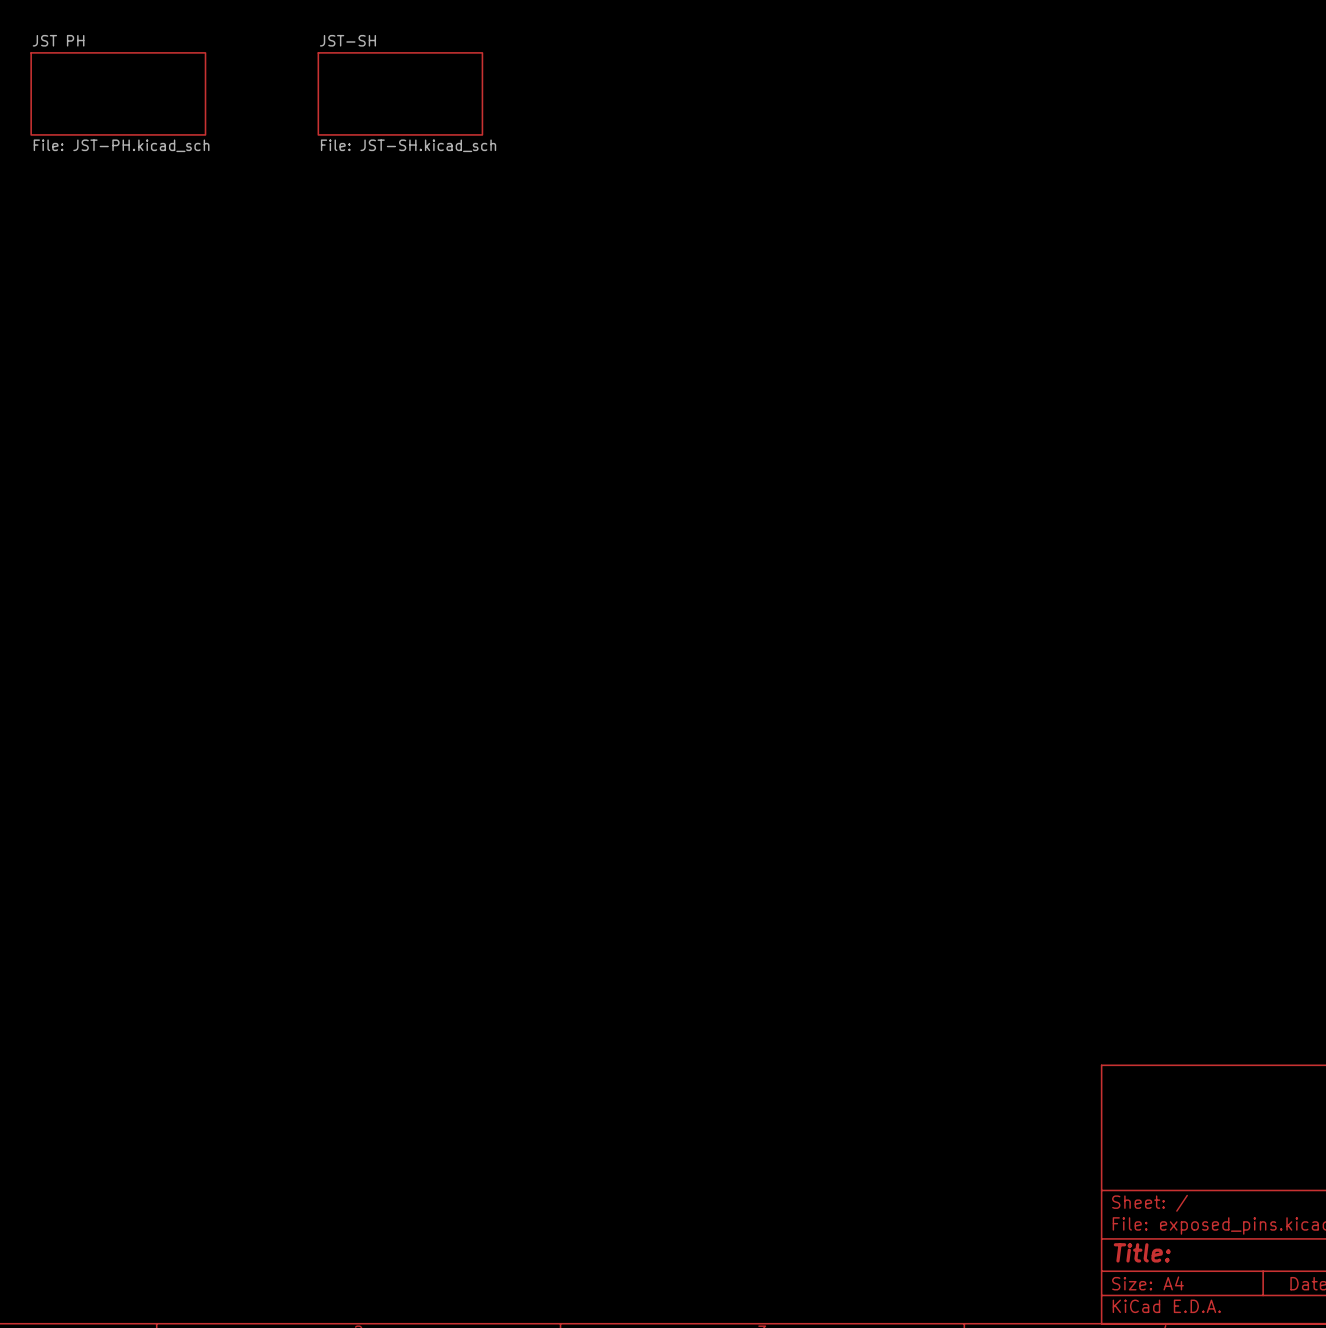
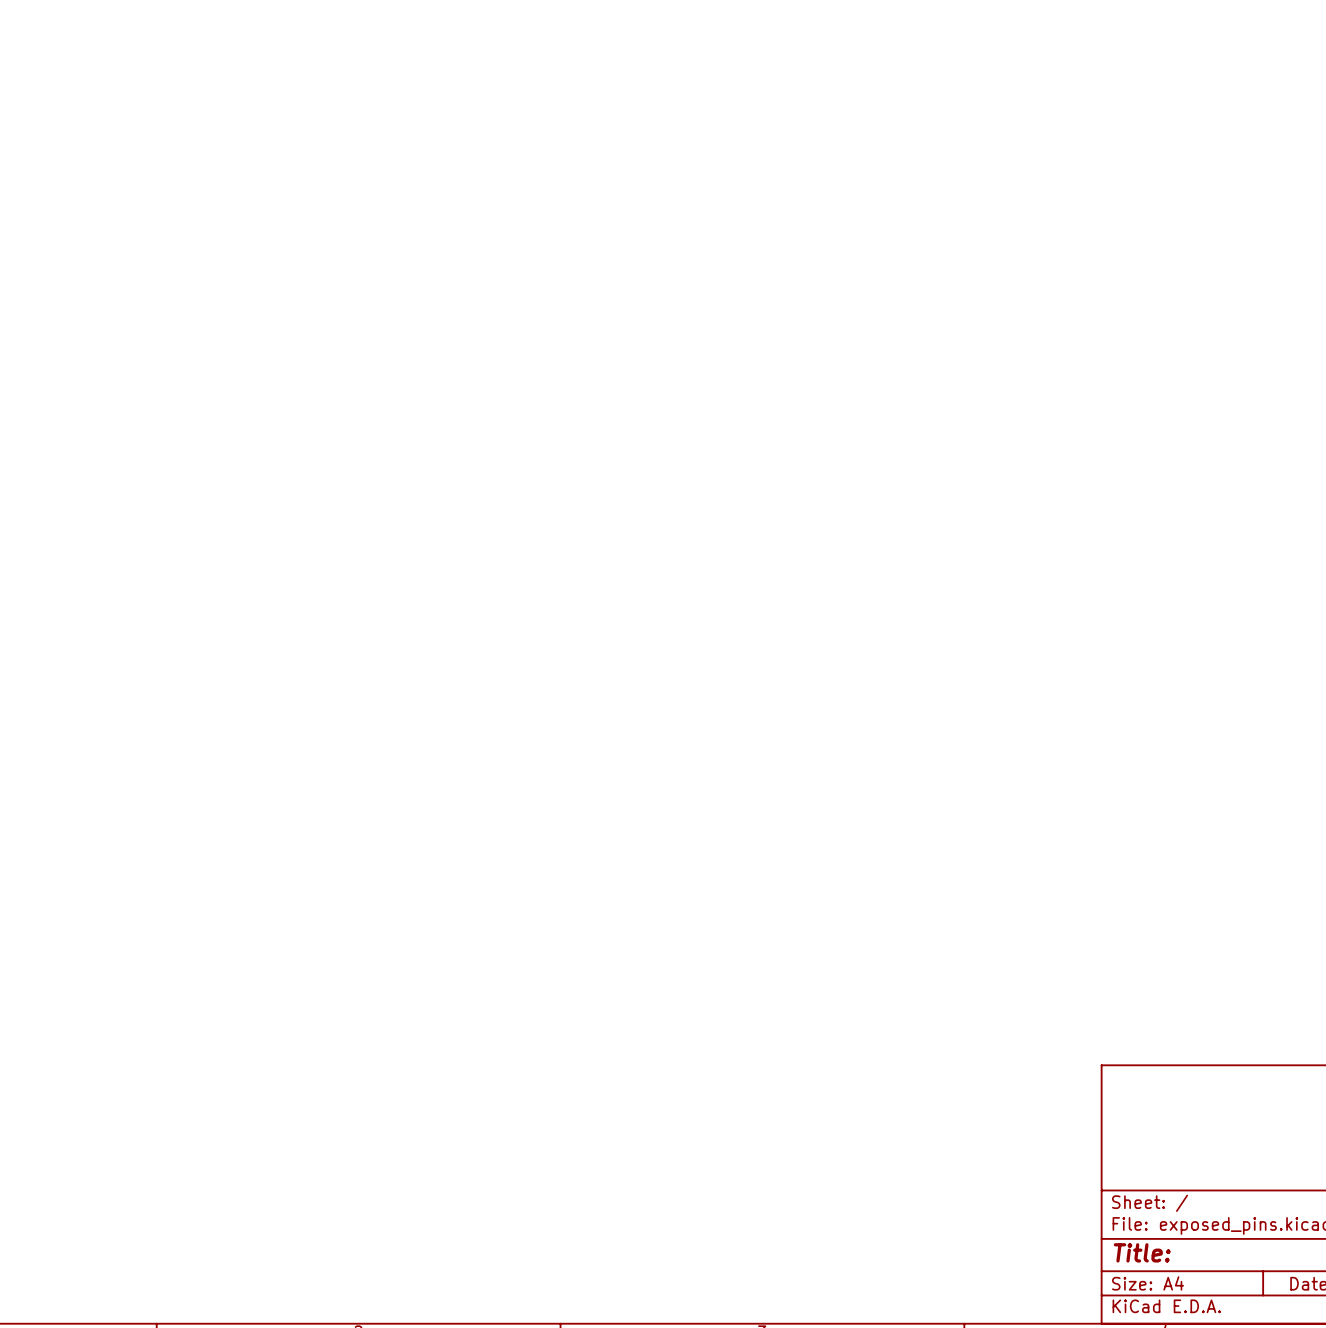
sheet JST PH: File: JST-PH.kicad_sch (118, 93) -> none
sheet JST-SH: File: JST-SH.kicad_sch (400, 93) -> none

